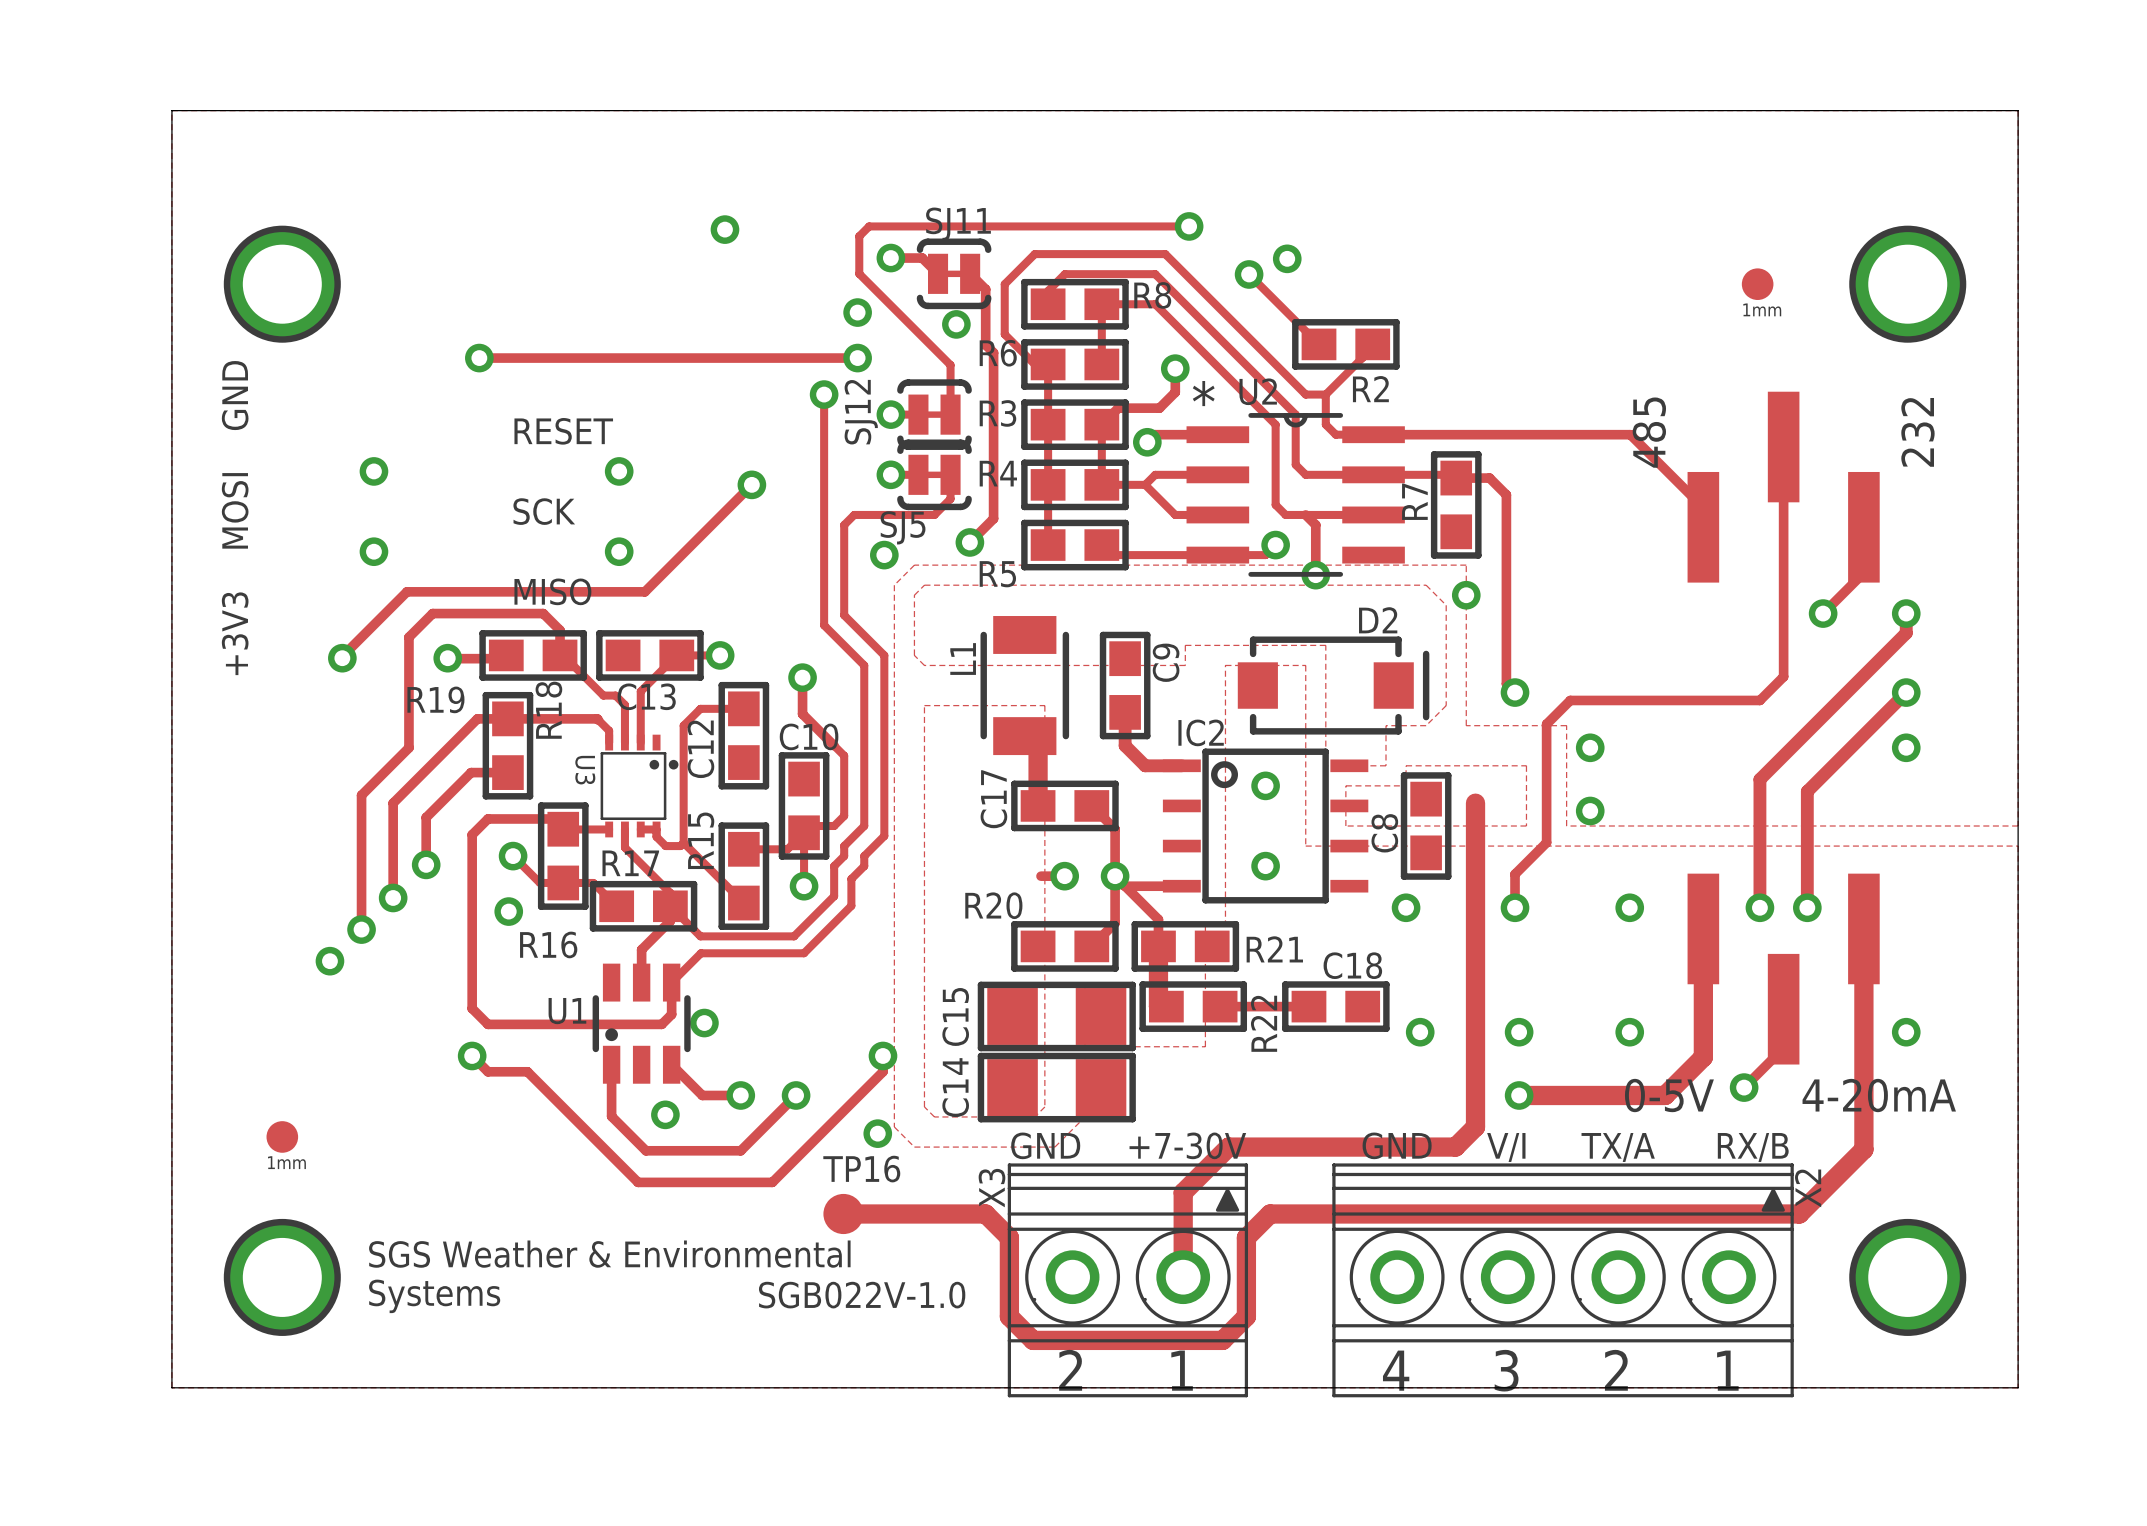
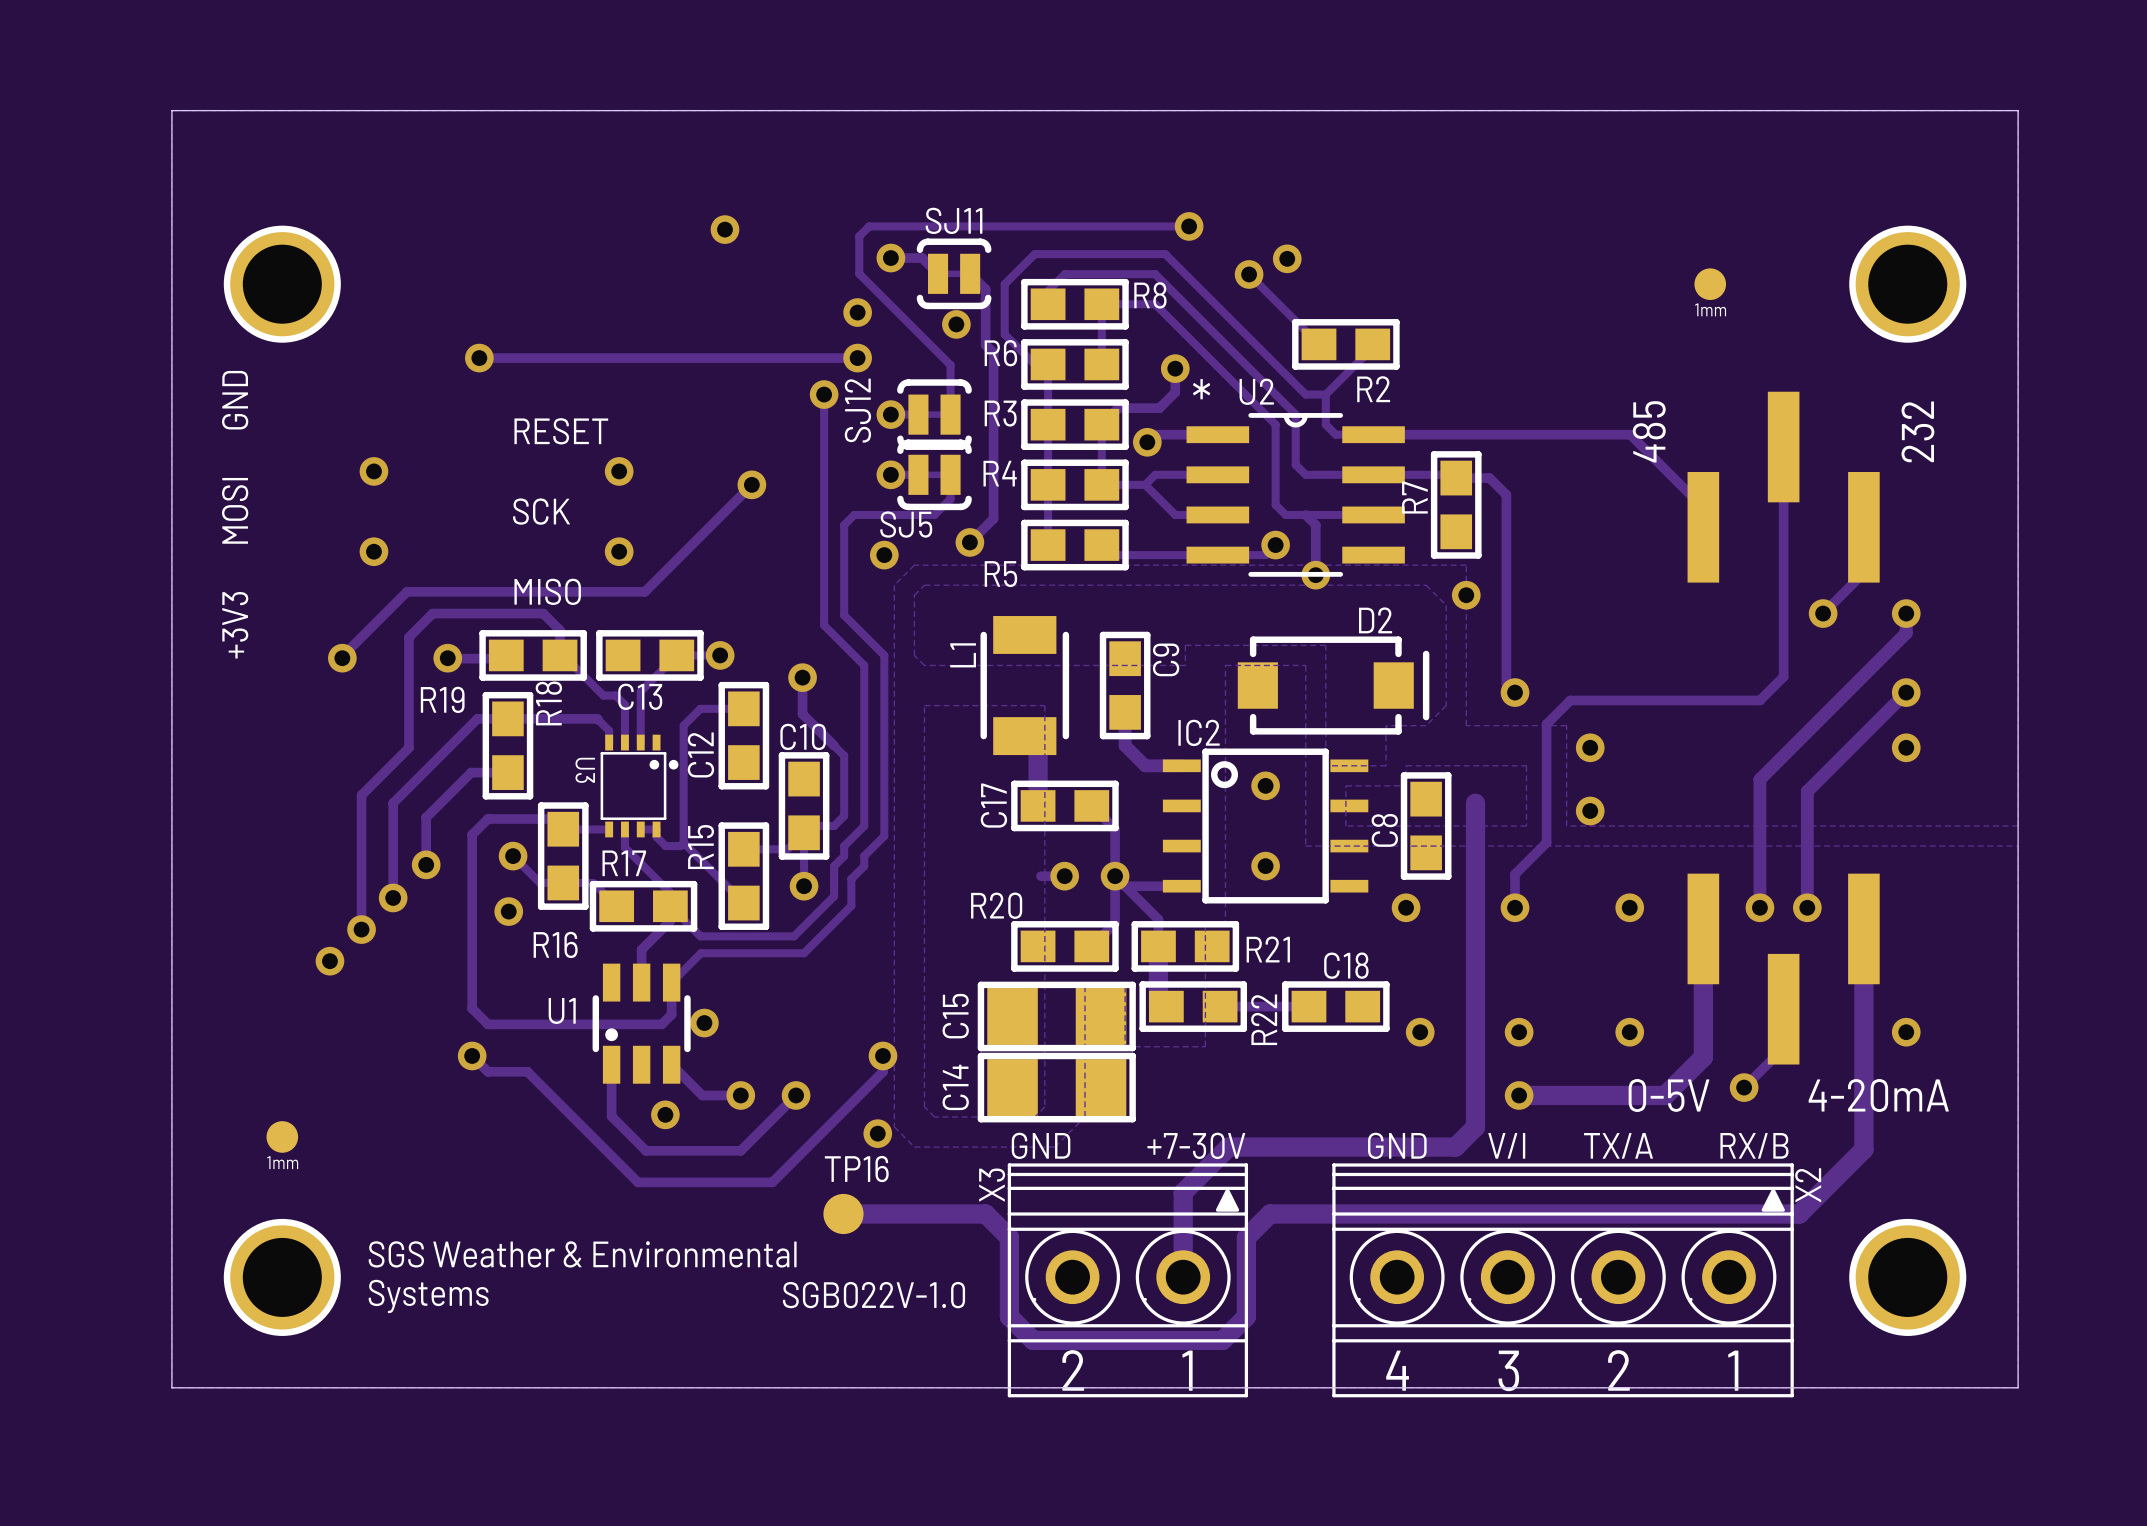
part position: (1757, 284) -> (1710, 284)

